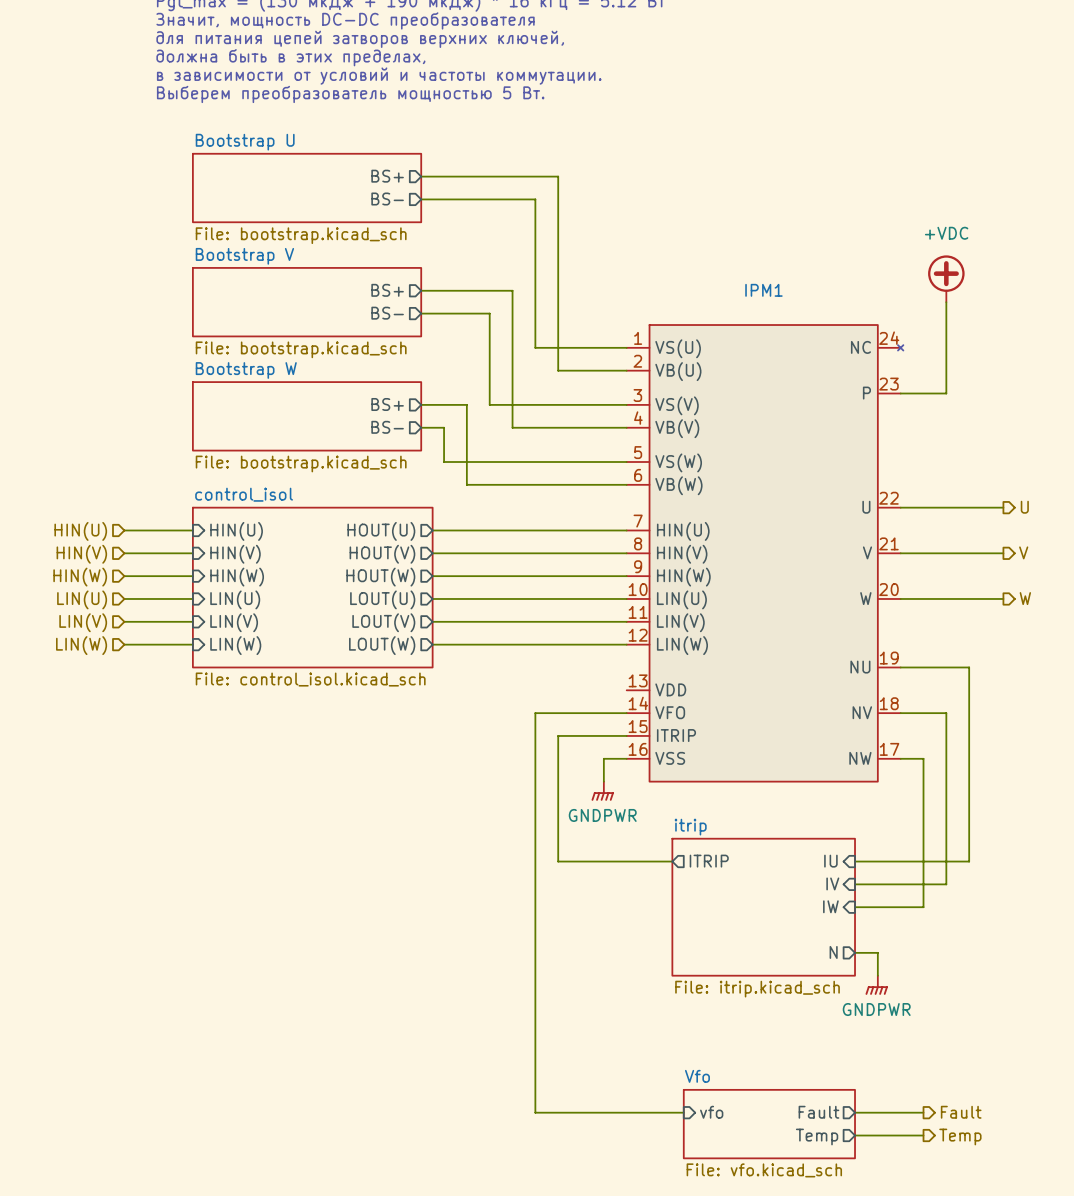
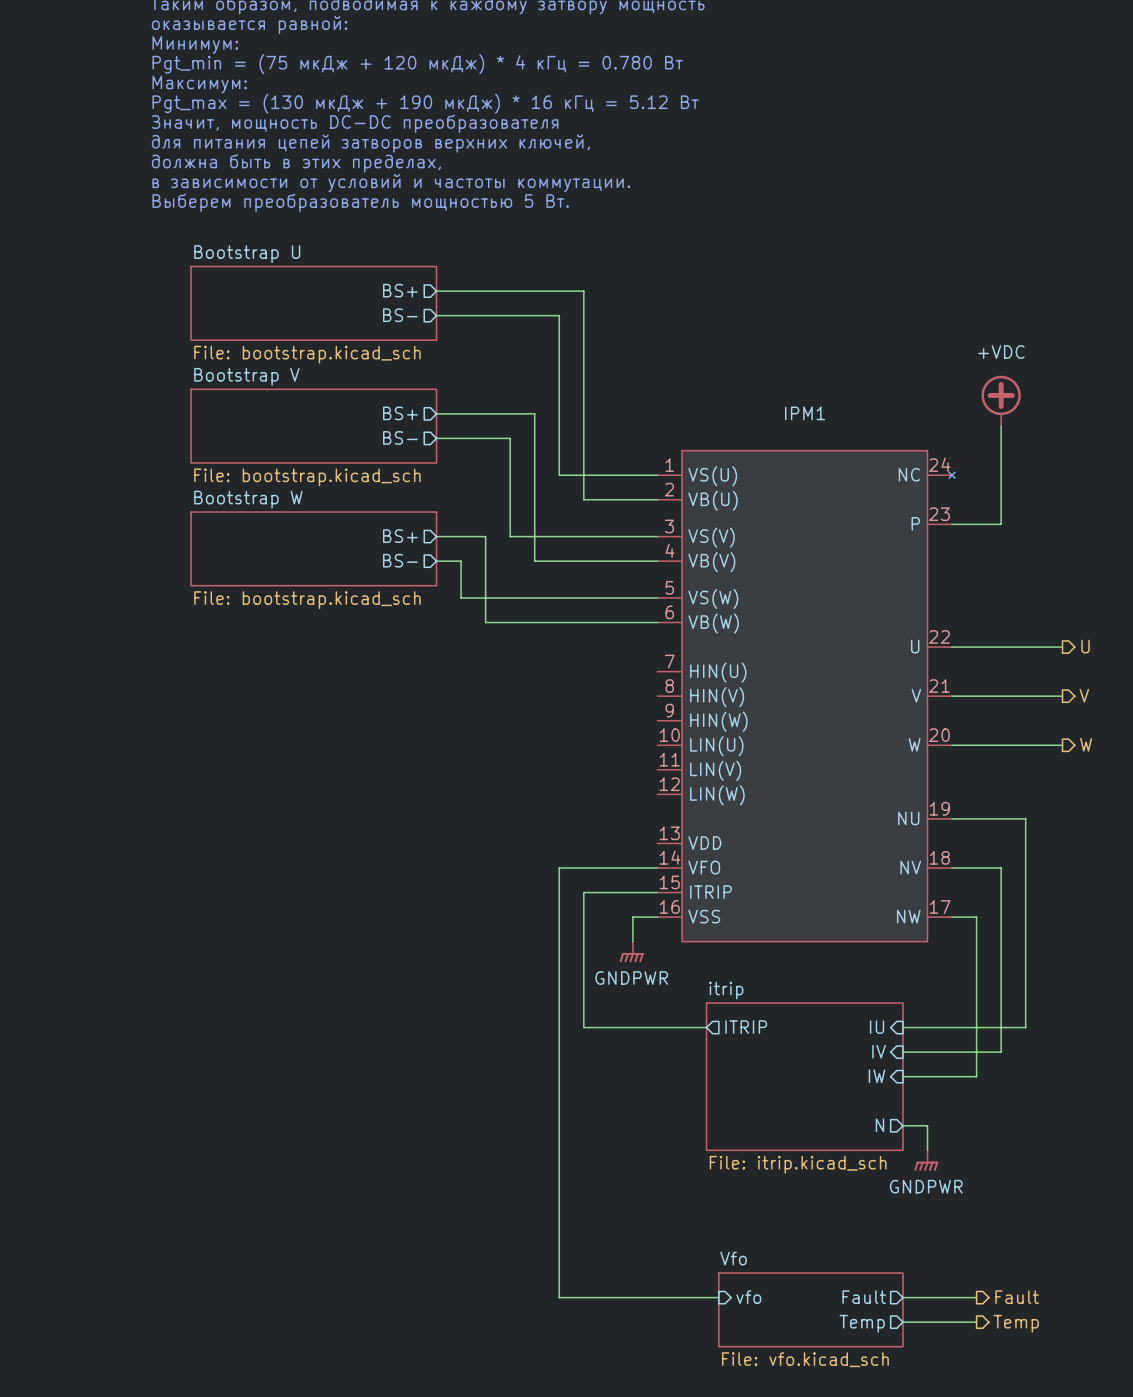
wire: (124, 530) (192, 530) -> none
wire: (432, 530) (626, 530) -> none
hierarchical label: HIN(U) (80, 531) -> none
sheet pin: HIN(U) (236, 531) -> none
sheet pin: HOUT(U) (381, 531) -> none
wire: (124, 553) (192, 553) -> none
wire: (432, 553) (626, 553) -> none
hierarchical label: HIN(V) (81, 554) -> none
sheet pin: HIN(V) (235, 554) -> none
sheet pin: HOUT(V) (382, 554) -> none
wire: (124, 576) (192, 576) -> none
wire: (432, 576) (626, 576) -> none
hierarchical label: HIN(W) (80, 577) -> none
sheet pin: HIN(W) (237, 577) -> none
sheet pin: HOUT(W) (380, 577) -> none
sheet control_isol: File: control_isol.kicad_sch (312, 587) -> none
wire: (124, 598) (192, 598) -> none
wire: (432, 598) (626, 598) -> none
hierarchical label: LIN(U) (82, 599) -> none
sheet pin: LIN(U) (235, 599) -> none
sheet pin: LOUT(U) (382, 599) -> none
wire: (124, 621) (192, 621) -> none
wire: (432, 621) (626, 621) -> none
hierarchical label: LIN(V) (83, 622) -> none
sheet pin: LIN(V) (234, 622) -> none
sheet pin: LOUT(V) (383, 622) -> none
wire: (124, 644) (192, 644) -> none
wire: (432, 644) (626, 644) -> none
hierarchical label: LIN(W) (81, 645) -> none
sheet pin: LIN(W) (235, 645) -> none
sheet pin: LOUT(W) (382, 645) -> none

